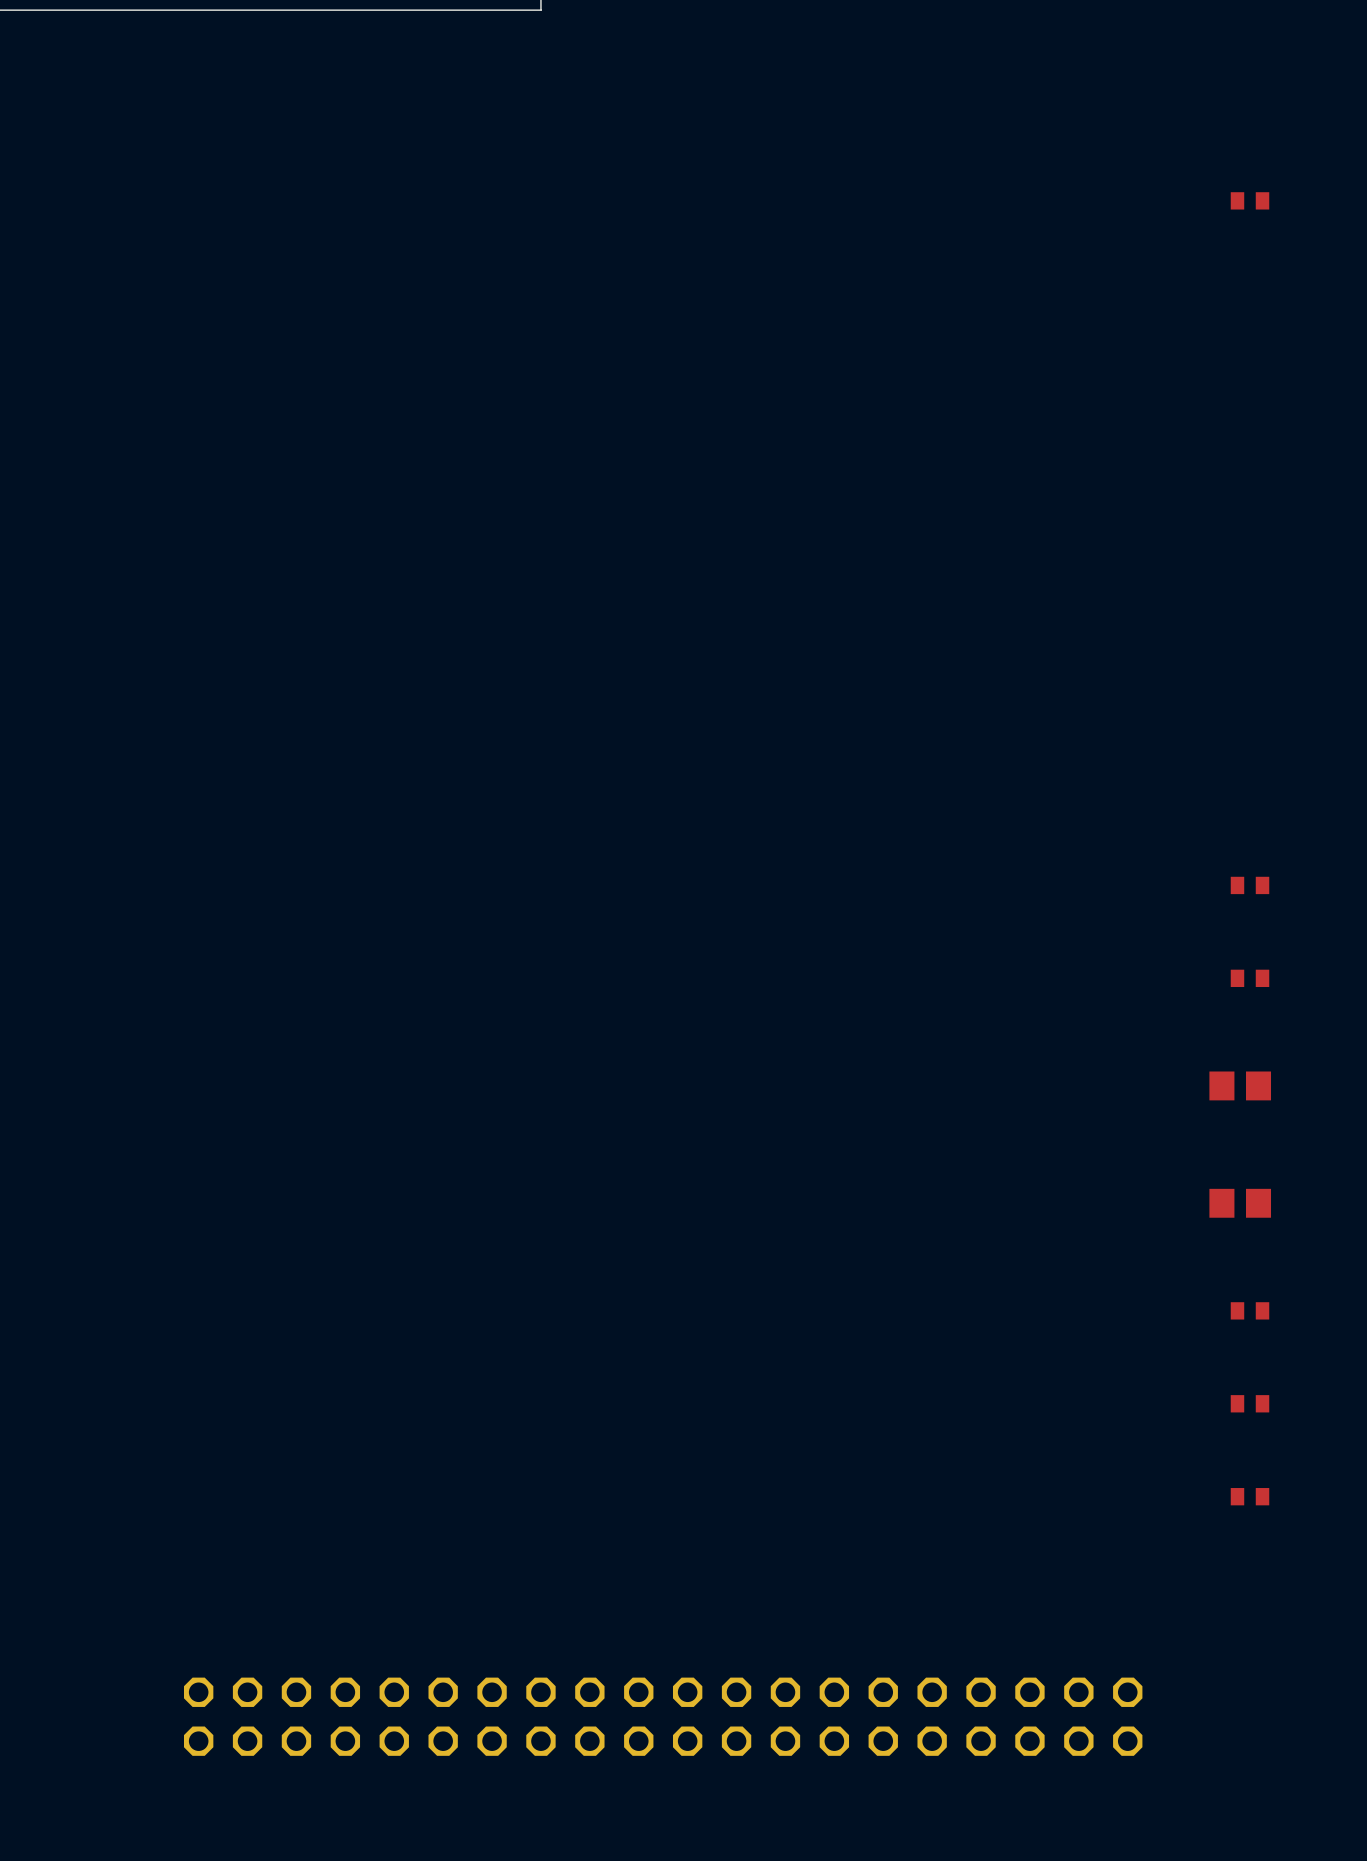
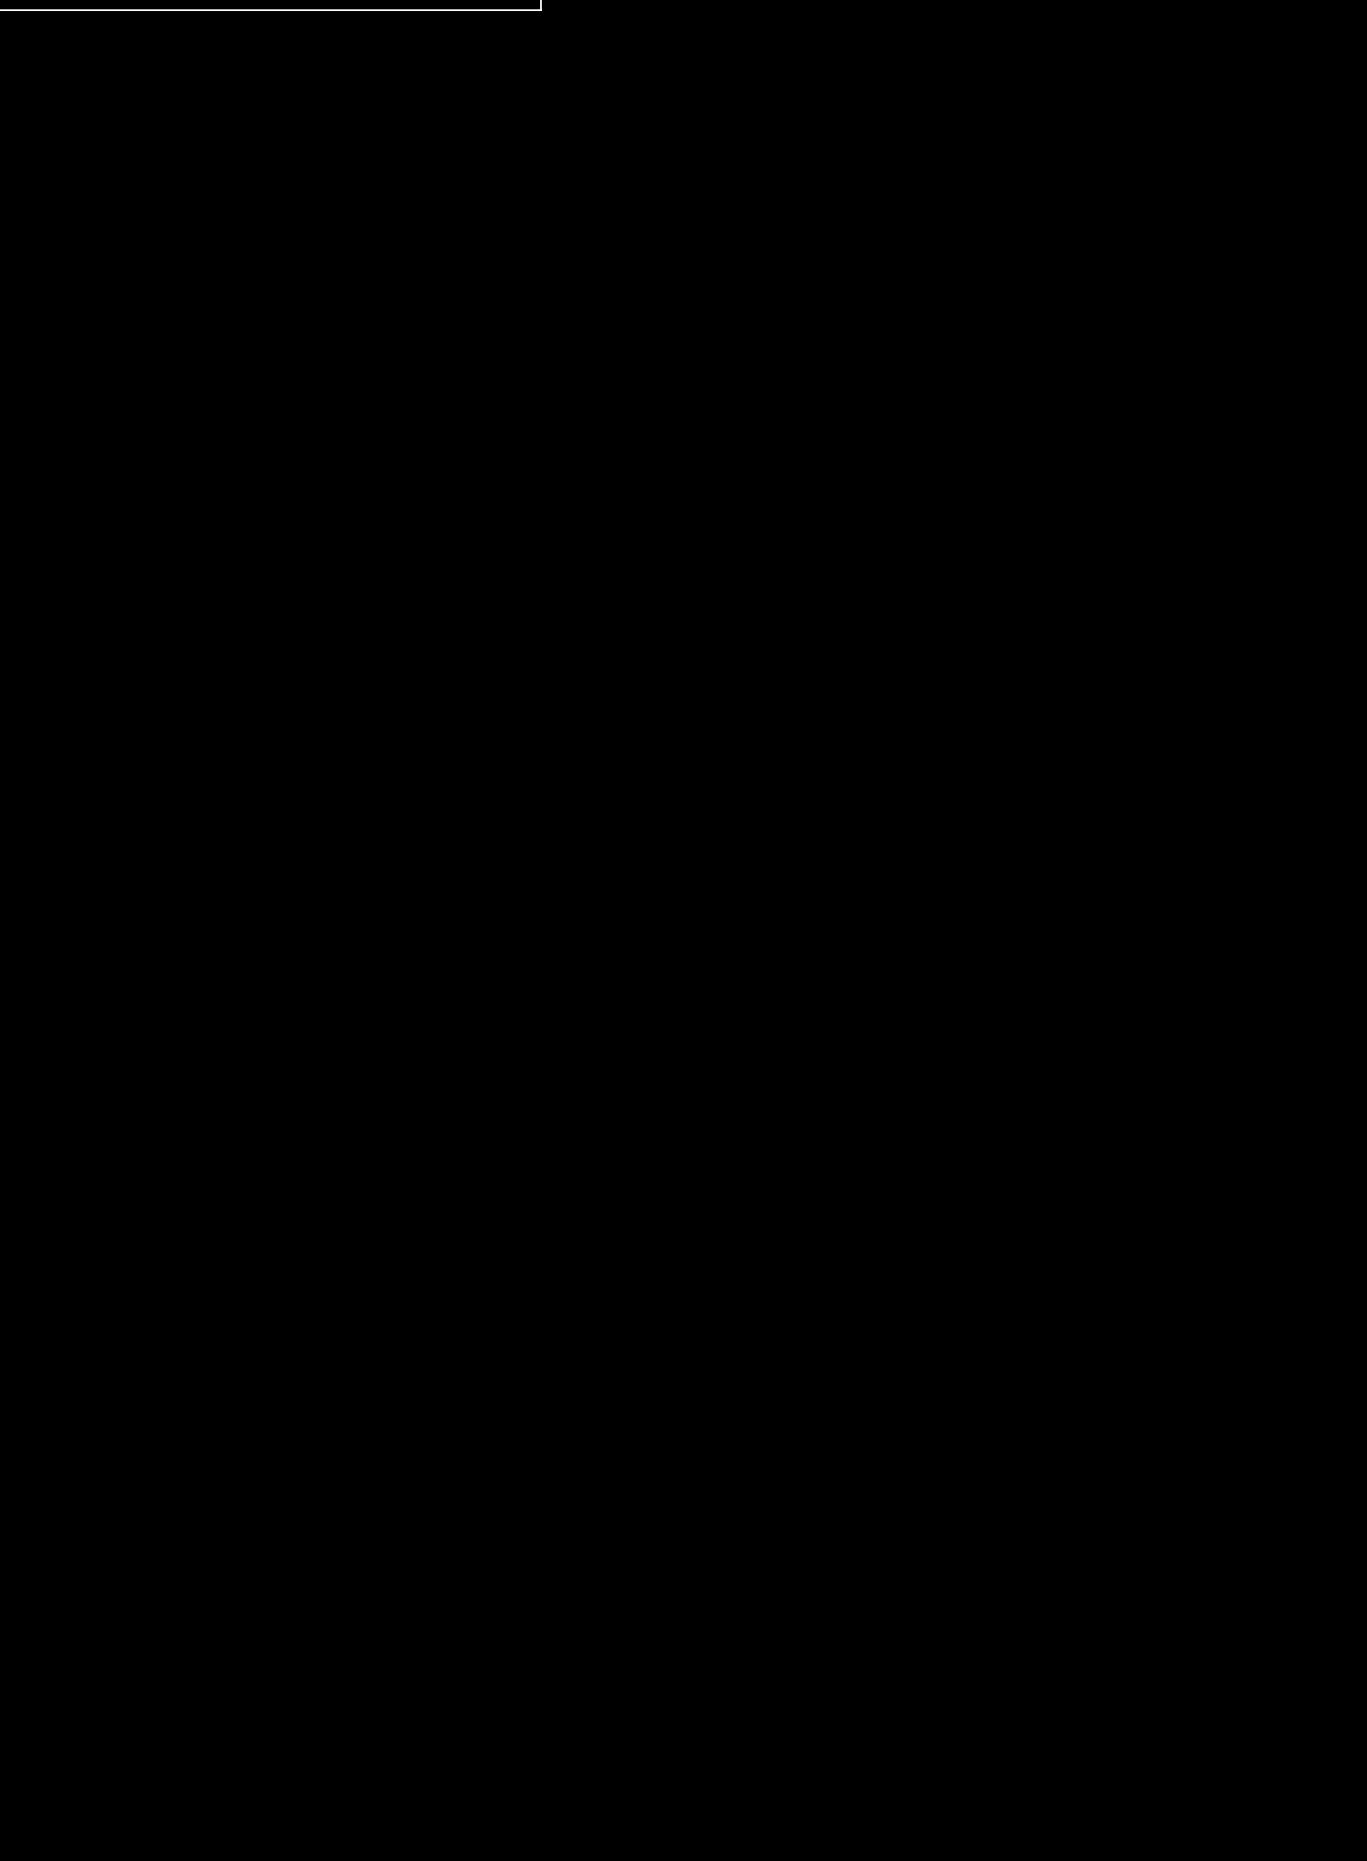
part: (1249, 200) -> none
part: (1249, 885) -> none
part: (1249, 978) -> none
part: (1240, 1085) -> none
part: (1240, 1203) -> none
part: (1249, 1310) -> none
part: (1249, 1403) -> none
part: (1249, 1496) -> none
part: (663, 1716) -> none

